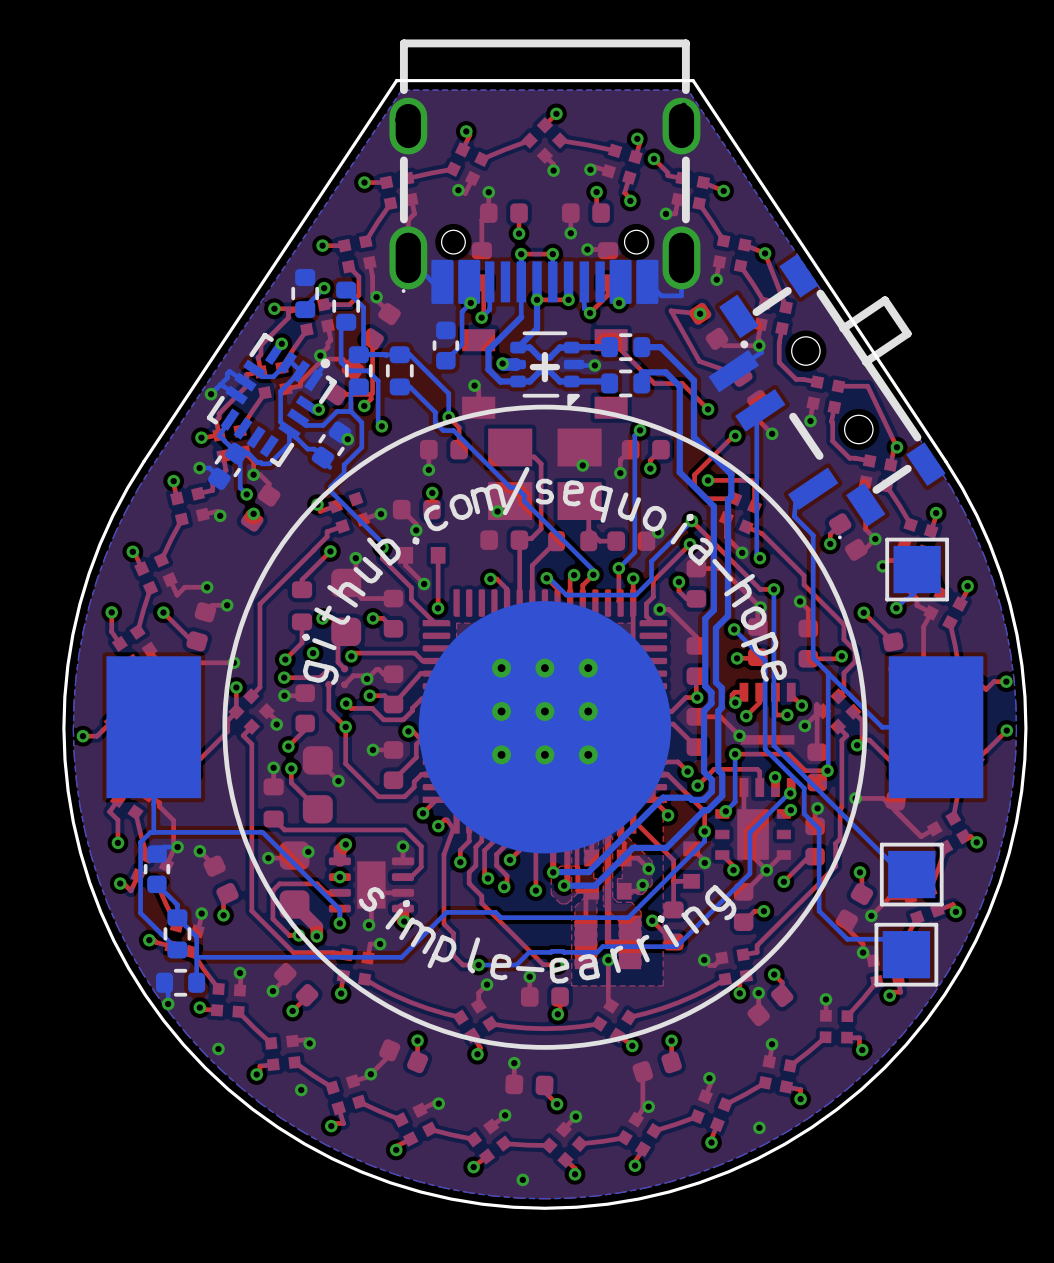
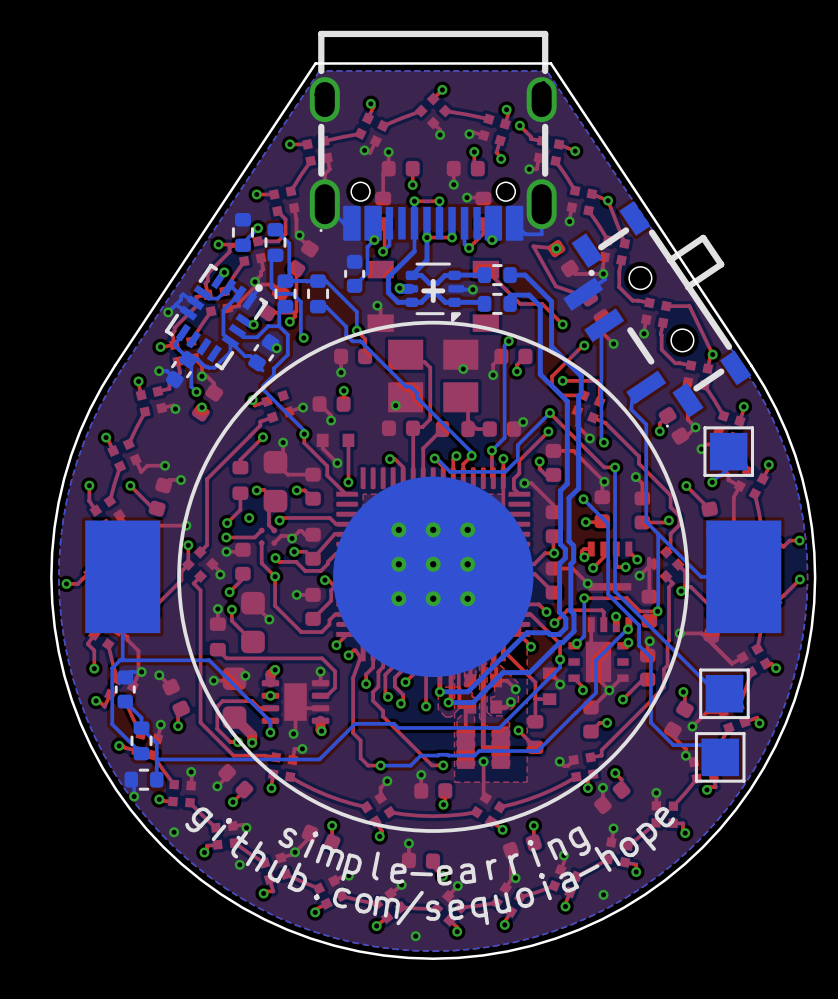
text rotation: 0° (516, 491) -> 10.9° clockwise (410, 908)
text position: / (516, 491) -> / (410, 908)
text: s (544, 491) -> none
text: e (573, 493) -> none
text: m (488, 499) -> none
text rotation: 0° (601, 504) -> 21.9° counterclockwise (479, 910)
text position: q (601, 504) -> q (479, 910)
text: o (461, 506) -> none
text: u (629, 506) -> none
text rotation: 0° (436, 517) -> 43.7° clockwise (341, 898)
text position: c (436, 517) -> c (341, 898)
text: o (654, 518) -> none
text: i (682, 529) -> none
text rotation: 0° (415, 540) -> 54.6° clockwise (316, 897)
text position: . (415, 540) -> . (316, 897)
text rotation: 0° (383, 551) -> 65.6° clockwise (297, 877)
text position: b (383, 551) -> b (297, 877)
text: a (700, 551) -> none
text: u (368, 570) -> none
text: - (722, 570) -> none
text: h (739, 590) -> none
text: h (346, 594) -> none
text rotation: 0° (332, 615) -> 98.4° clockwise (239, 844)
text position: t (332, 615) -> t (239, 844)
text: o (753, 618) -> none
text: i (319, 641) -> none
text: p (759, 643) -> none
text: e (773, 671) -> none
text: g (320, 672) -> none
text: s (371, 899) -> none
text rotation: 0° (720, 902) -> 16° clockwise (579, 841)
text position: g (720, 902) -> g (579, 841)
text: i (397, 914) -> none
text rotation: 0° (695, 920) -> 13.6° clockwise (557, 849)
text position: n (695, 920) -> n (557, 849)
text: i (668, 931) -> none
text: m (417, 935) -> none
text: r (643, 948) -> none
text rotation: 0° (441, 951) -> 8.6° counterclockwise (351, 867)
text position: p (441, 951) -> p (351, 867)
text rotation: 0° (473, 955) -> 6.2° counterclockwise (375, 866)
text position: l (473, 955) -> l (375, 866)
text: r (616, 959) -> none
text: e (500, 967) -> none
text: a (589, 967) -> none
text: - (530, 969) -> none
text: e (559, 970) -> none
text: none -> e (664, 817)
text: none -> g (199, 819)
text: none -> i (221, 829)
text: none -> p (646, 836)
text: none -> s (287, 838)
text: none -> i (311, 844)
text: none -> o (629, 847)
text: none -> i (534, 853)
text: none -> h (255, 856)
text: none -> m (329, 857)
text: none -> h (607, 859)
text: none -> r (513, 864)
text: none -> r (491, 869)
text: none -> - (589, 870)
text: none -> u (277, 871)
text: none -> e (398, 873)
text: none -> - (421, 874)
text: none -> a (468, 873)
text: none -> e (444, 875)
text: none -> a (569, 882)
text: none -> i (545, 886)
text: none -> o (525, 897)
text: none -> o (363, 903)
text: none -> u (502, 902)
text: none -> m (386, 907)
text: none -> e (456, 909)
text: none -> s (433, 910)

